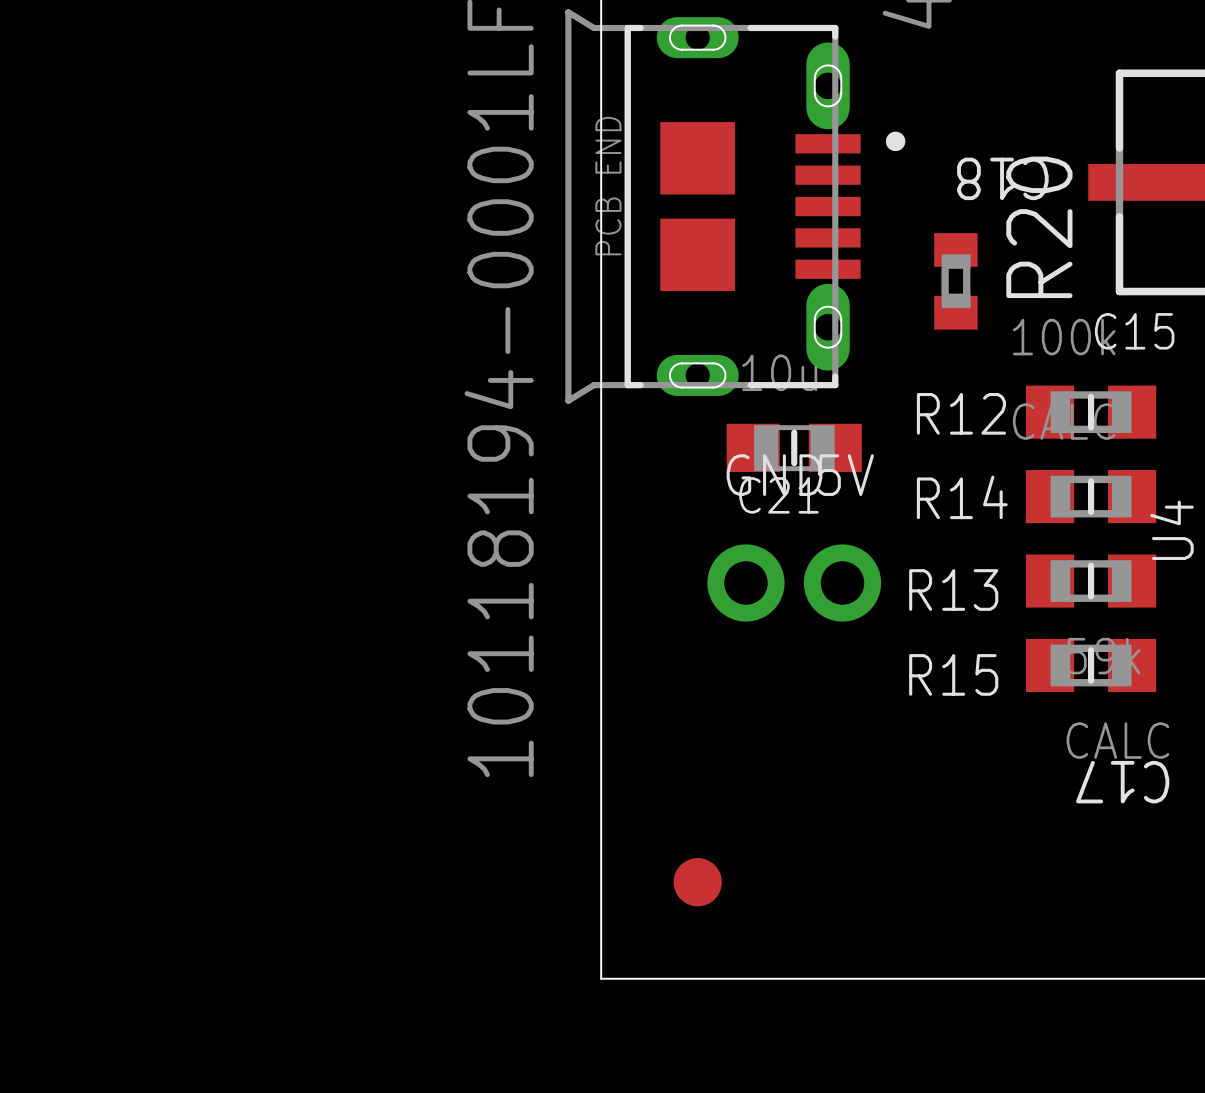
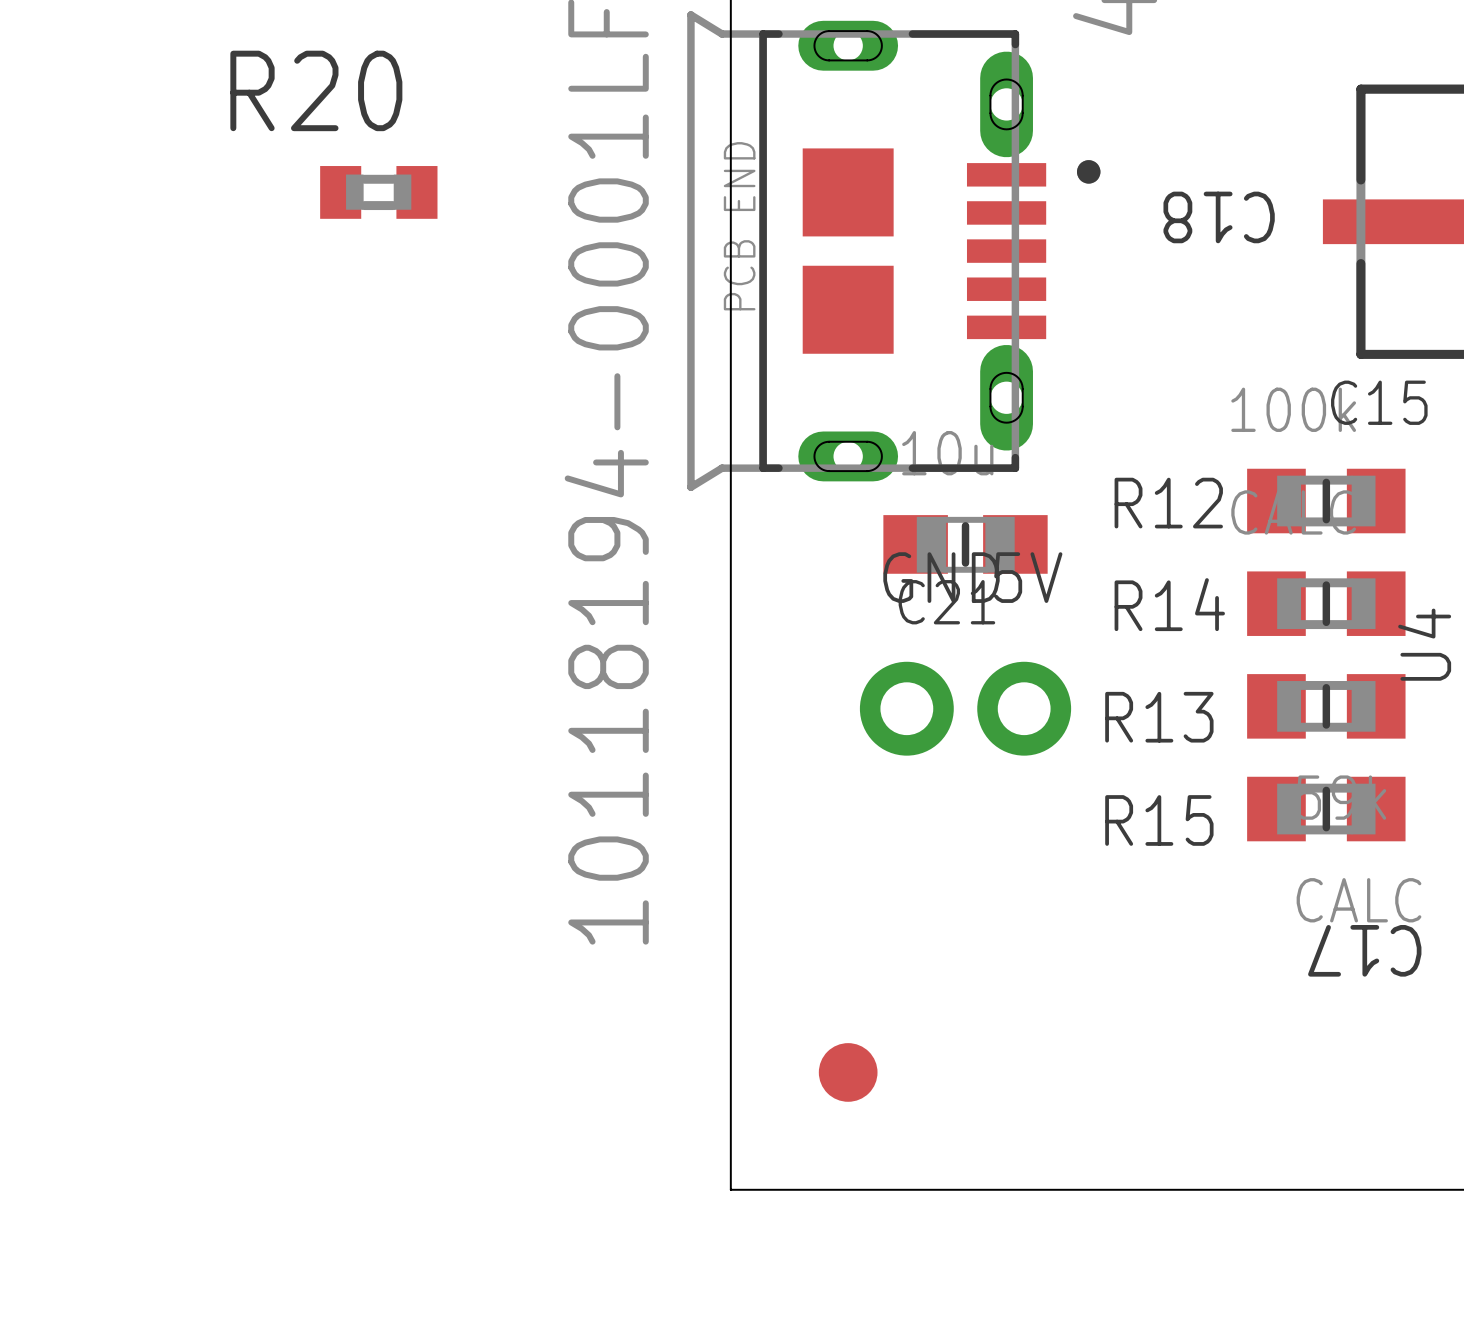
R20 name position: R20 (1039, 227) -> R20 (316, 90)
R20 rotation: 0° (955, 281) -> 90° clockwise (378, 192)
R20 position: (955, 281) -> (378, 192)

